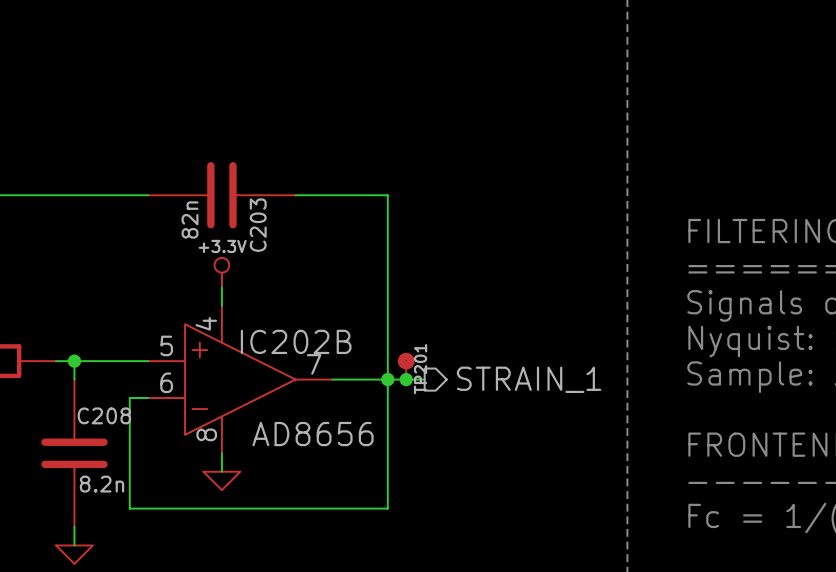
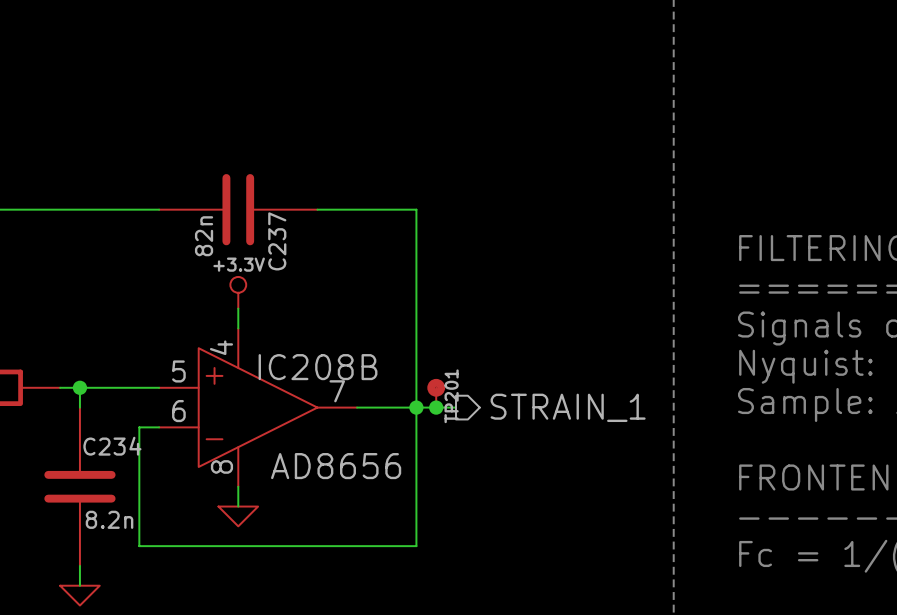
C203 name: C203 (258, 225) -> C237 (277, 241)
IC202B name: IC202B (296, 341) -> IC208B (318, 367)
C208 name: C208 (104, 415) -> C234 (112, 446)

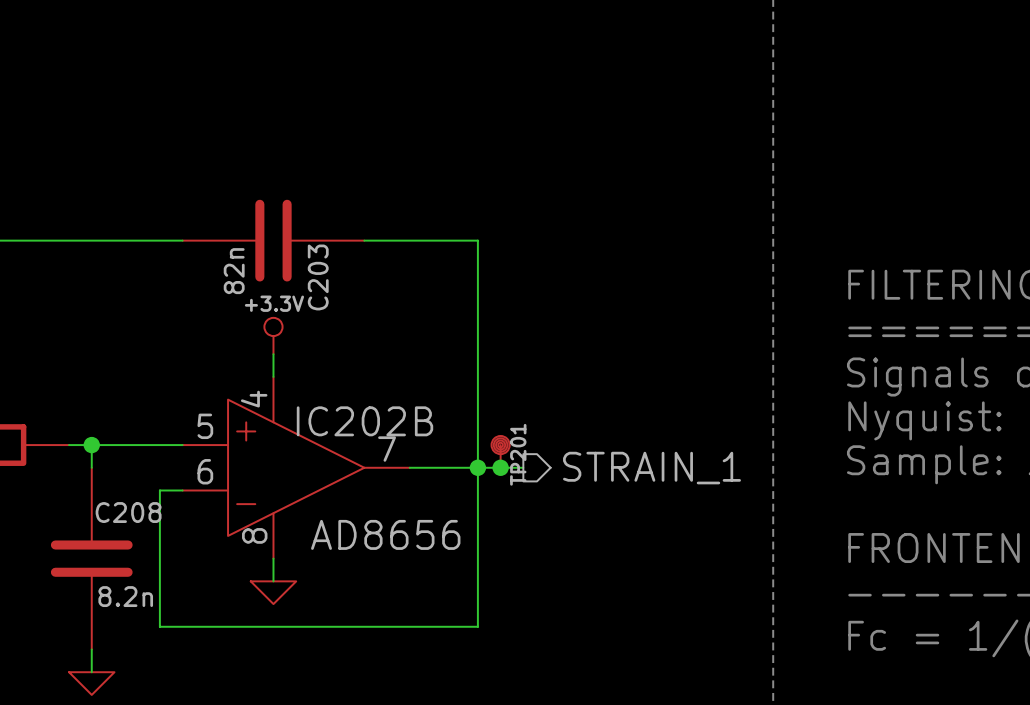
C237 name: C237 (277, 241) -> C203 (318, 277)
IC208B name: IC208B (318, 367) -> IC202B (364, 421)
C234 name: C234 (112, 446) -> C208 (128, 512)

